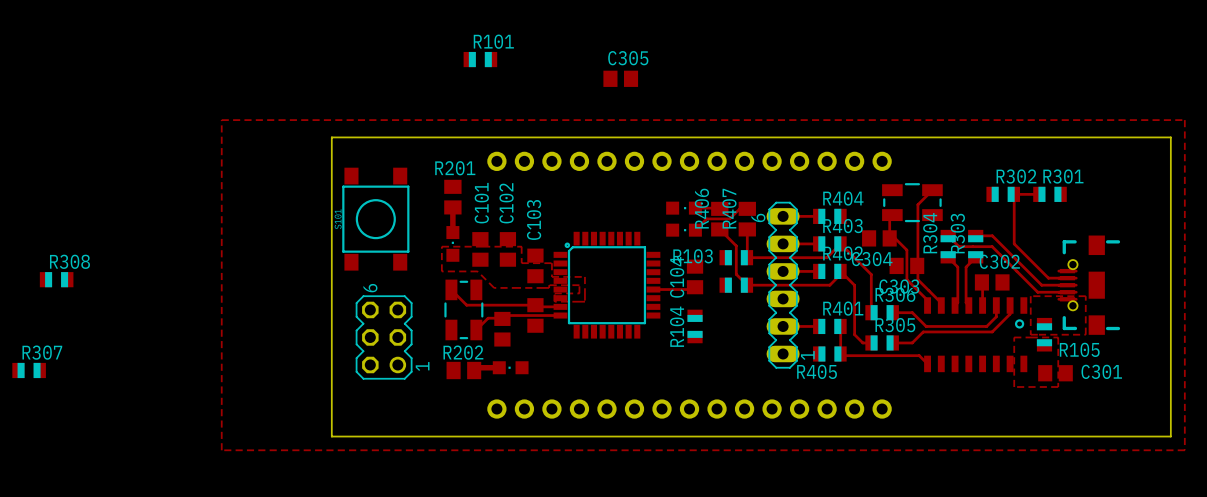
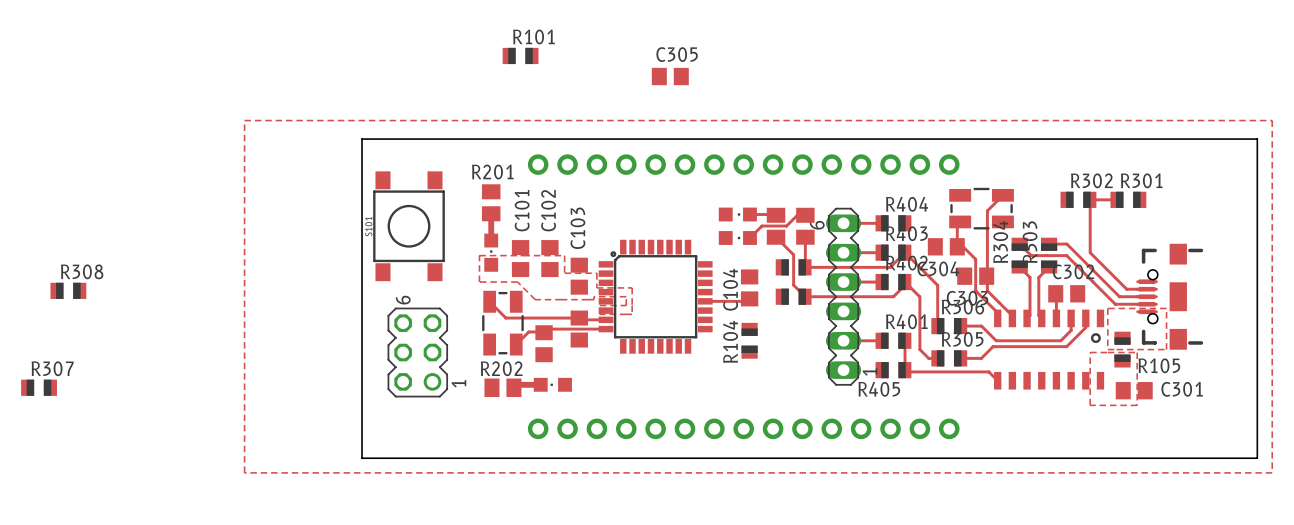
R406 name: R406 (701, 208) -> none
R407 name: R407 (729, 208) -> none
R103 name: R103 (693, 256) -> none

